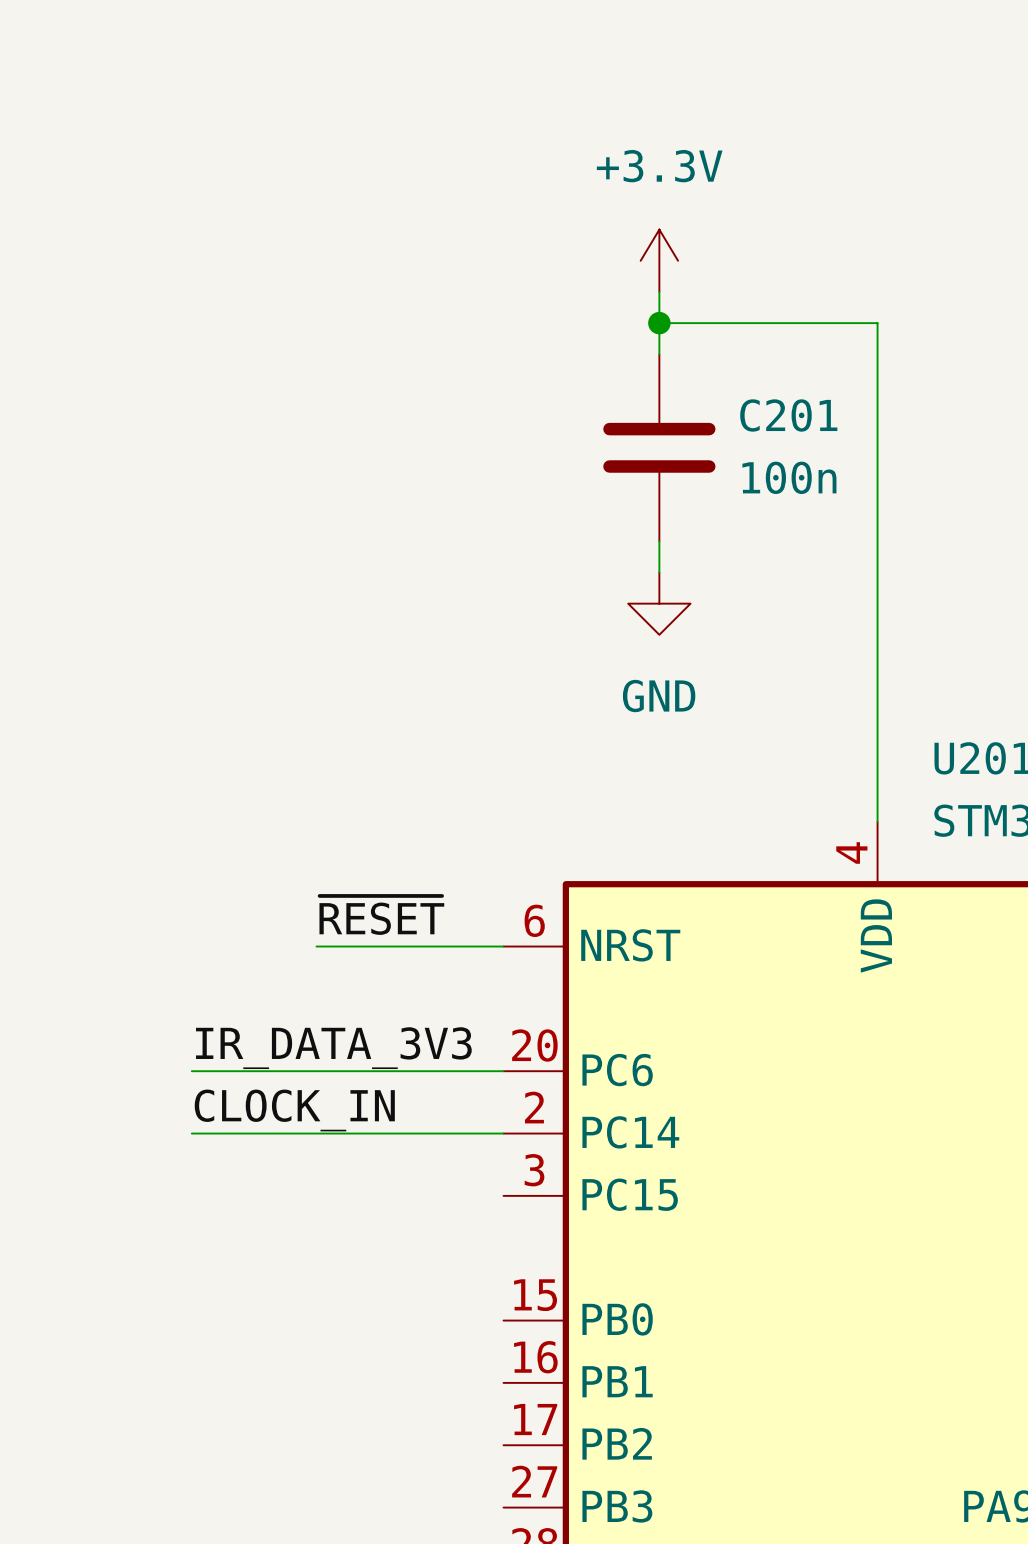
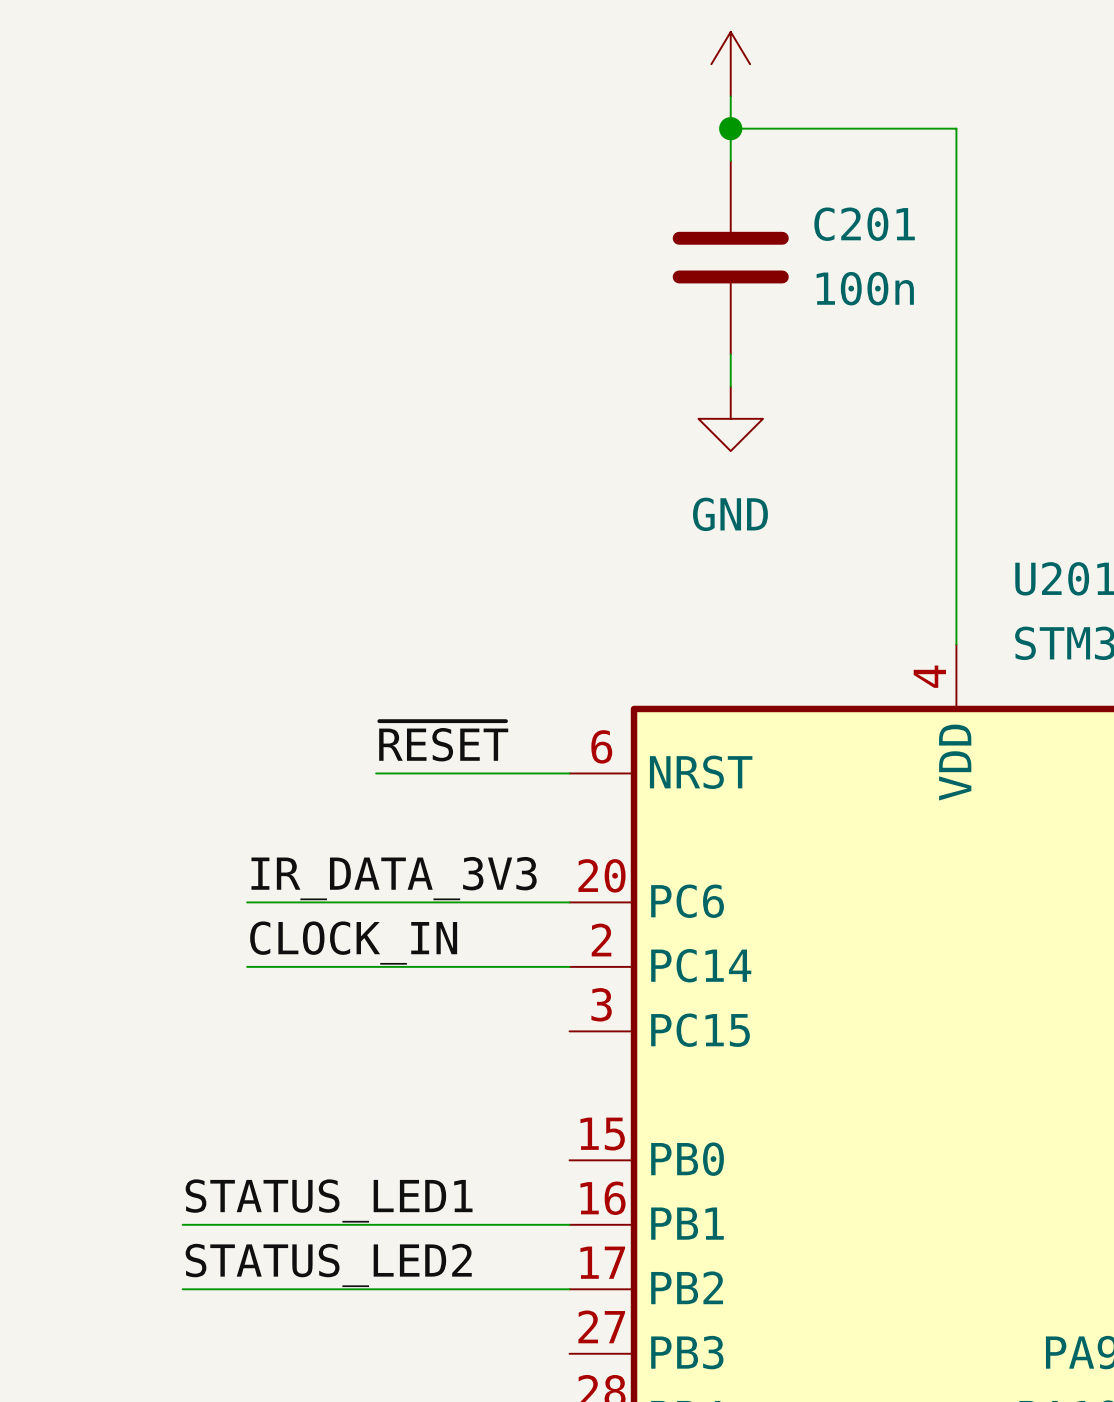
label: none -> STATUS_LED1 (329, 1200)
wire: none -> (182, 1224) (569, 1224)
label: none -> STATUS_LED2 (328, 1265)
wire: none -> (182, 1289) (569, 1289)

